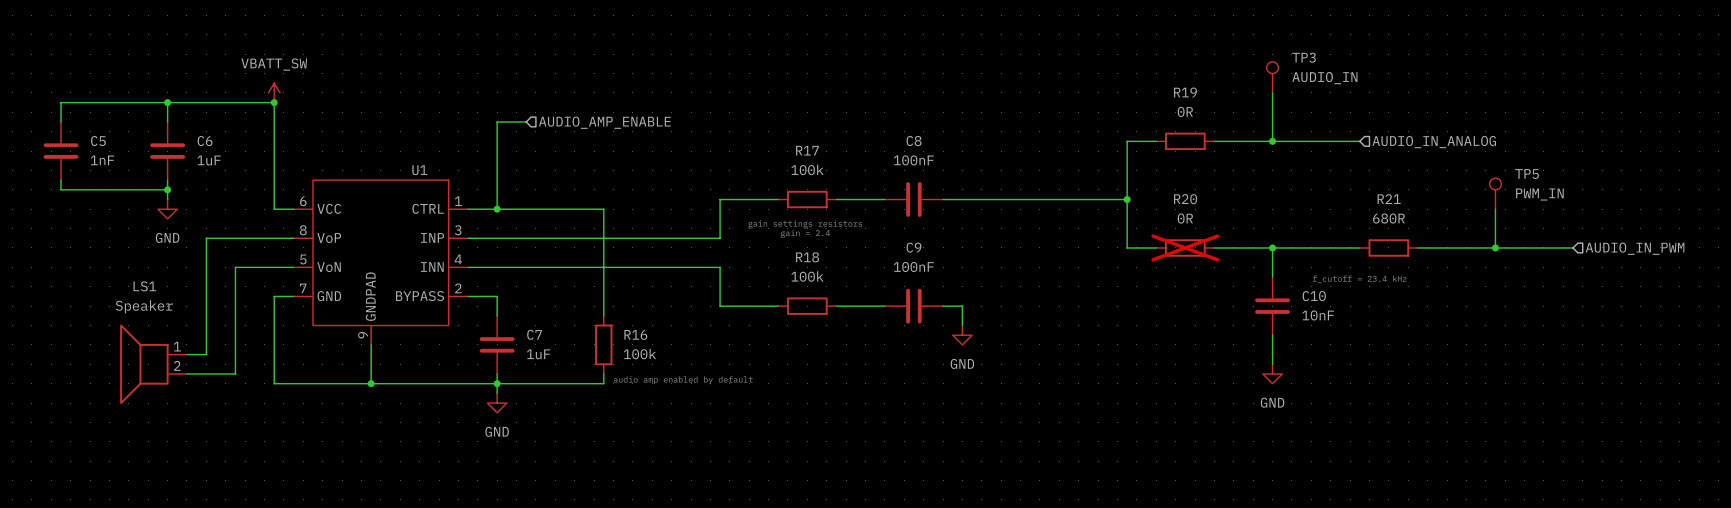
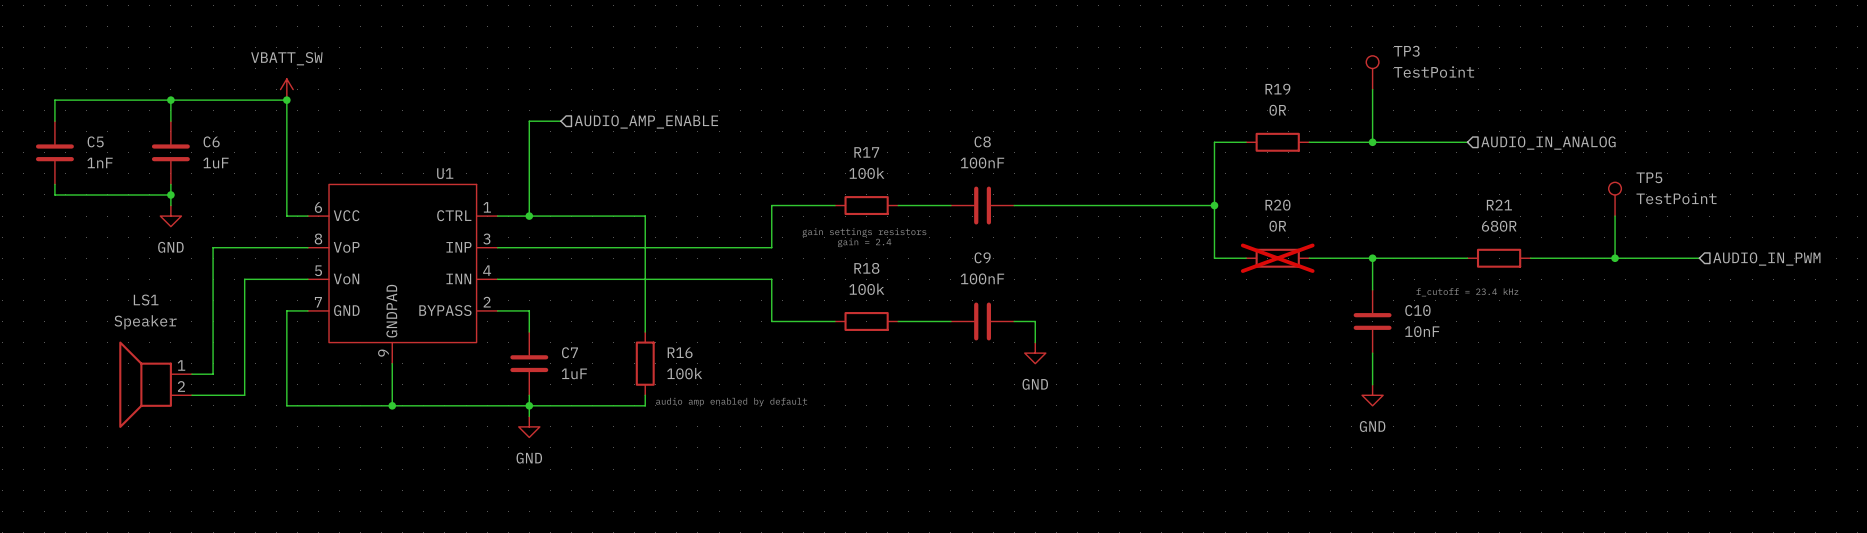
TP3 value: AUDIO_IN (1324, 78) -> TestPoint (1434, 72)
TP5 value: PWM_IN (1539, 194) -> TestPoint (1676, 198)

